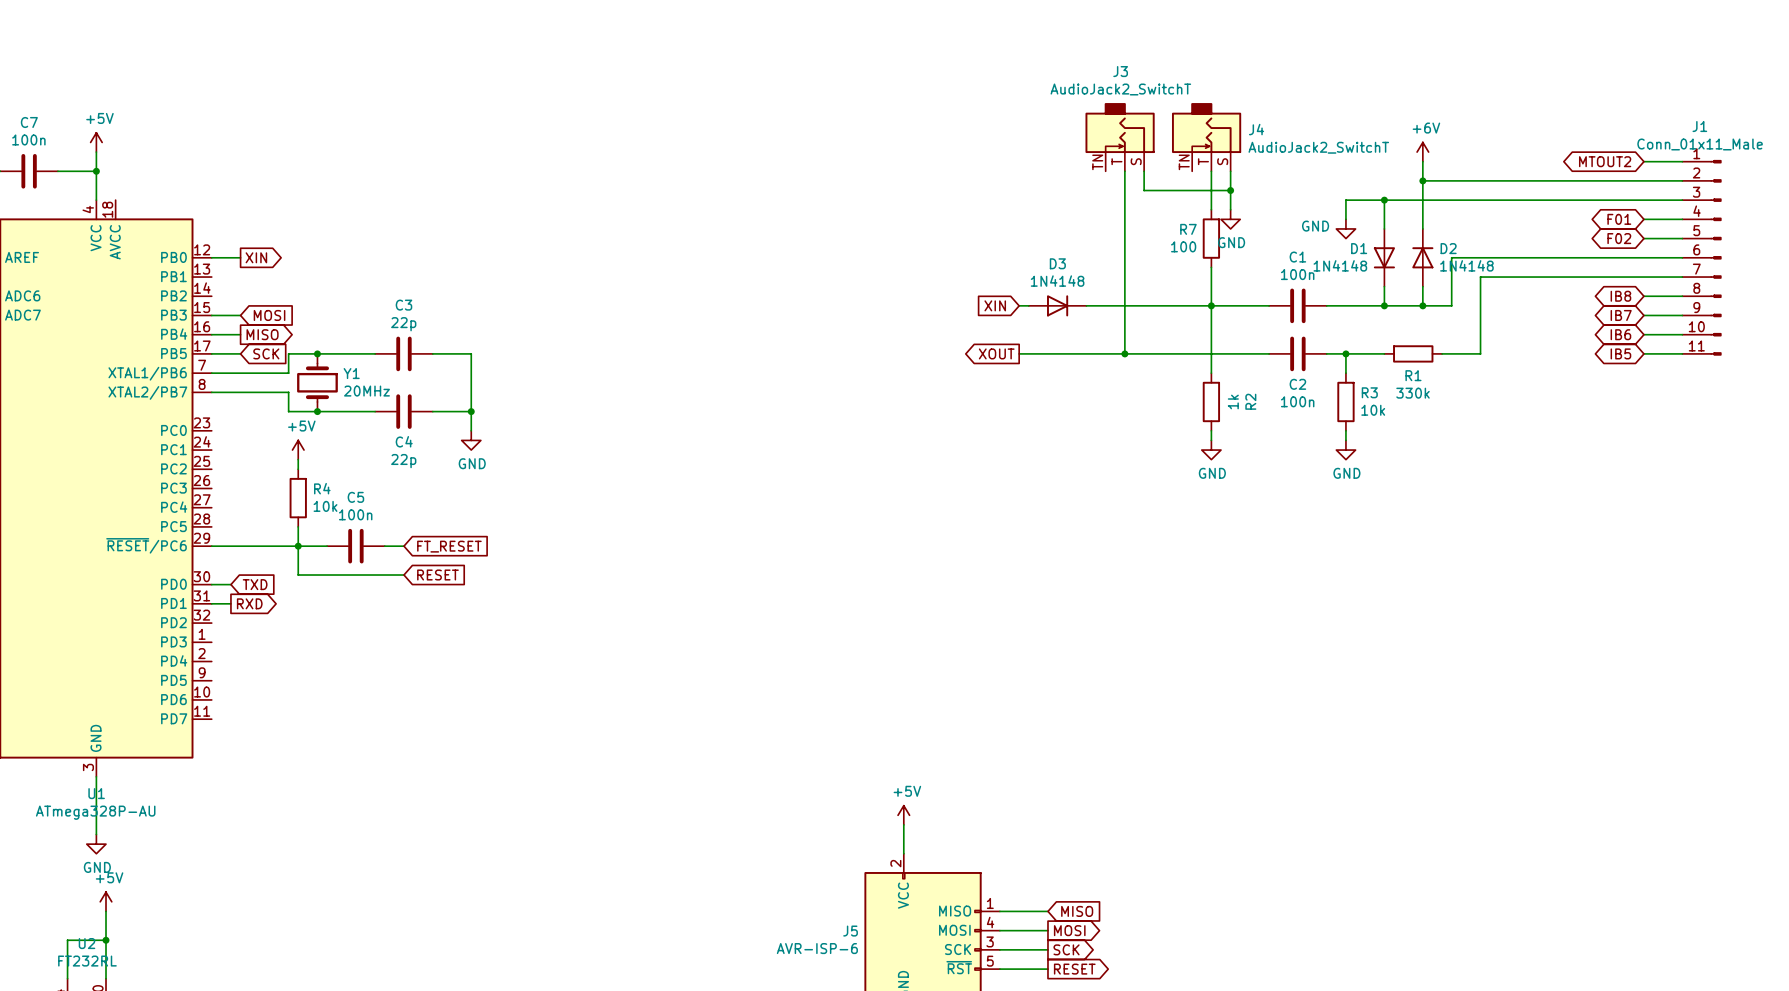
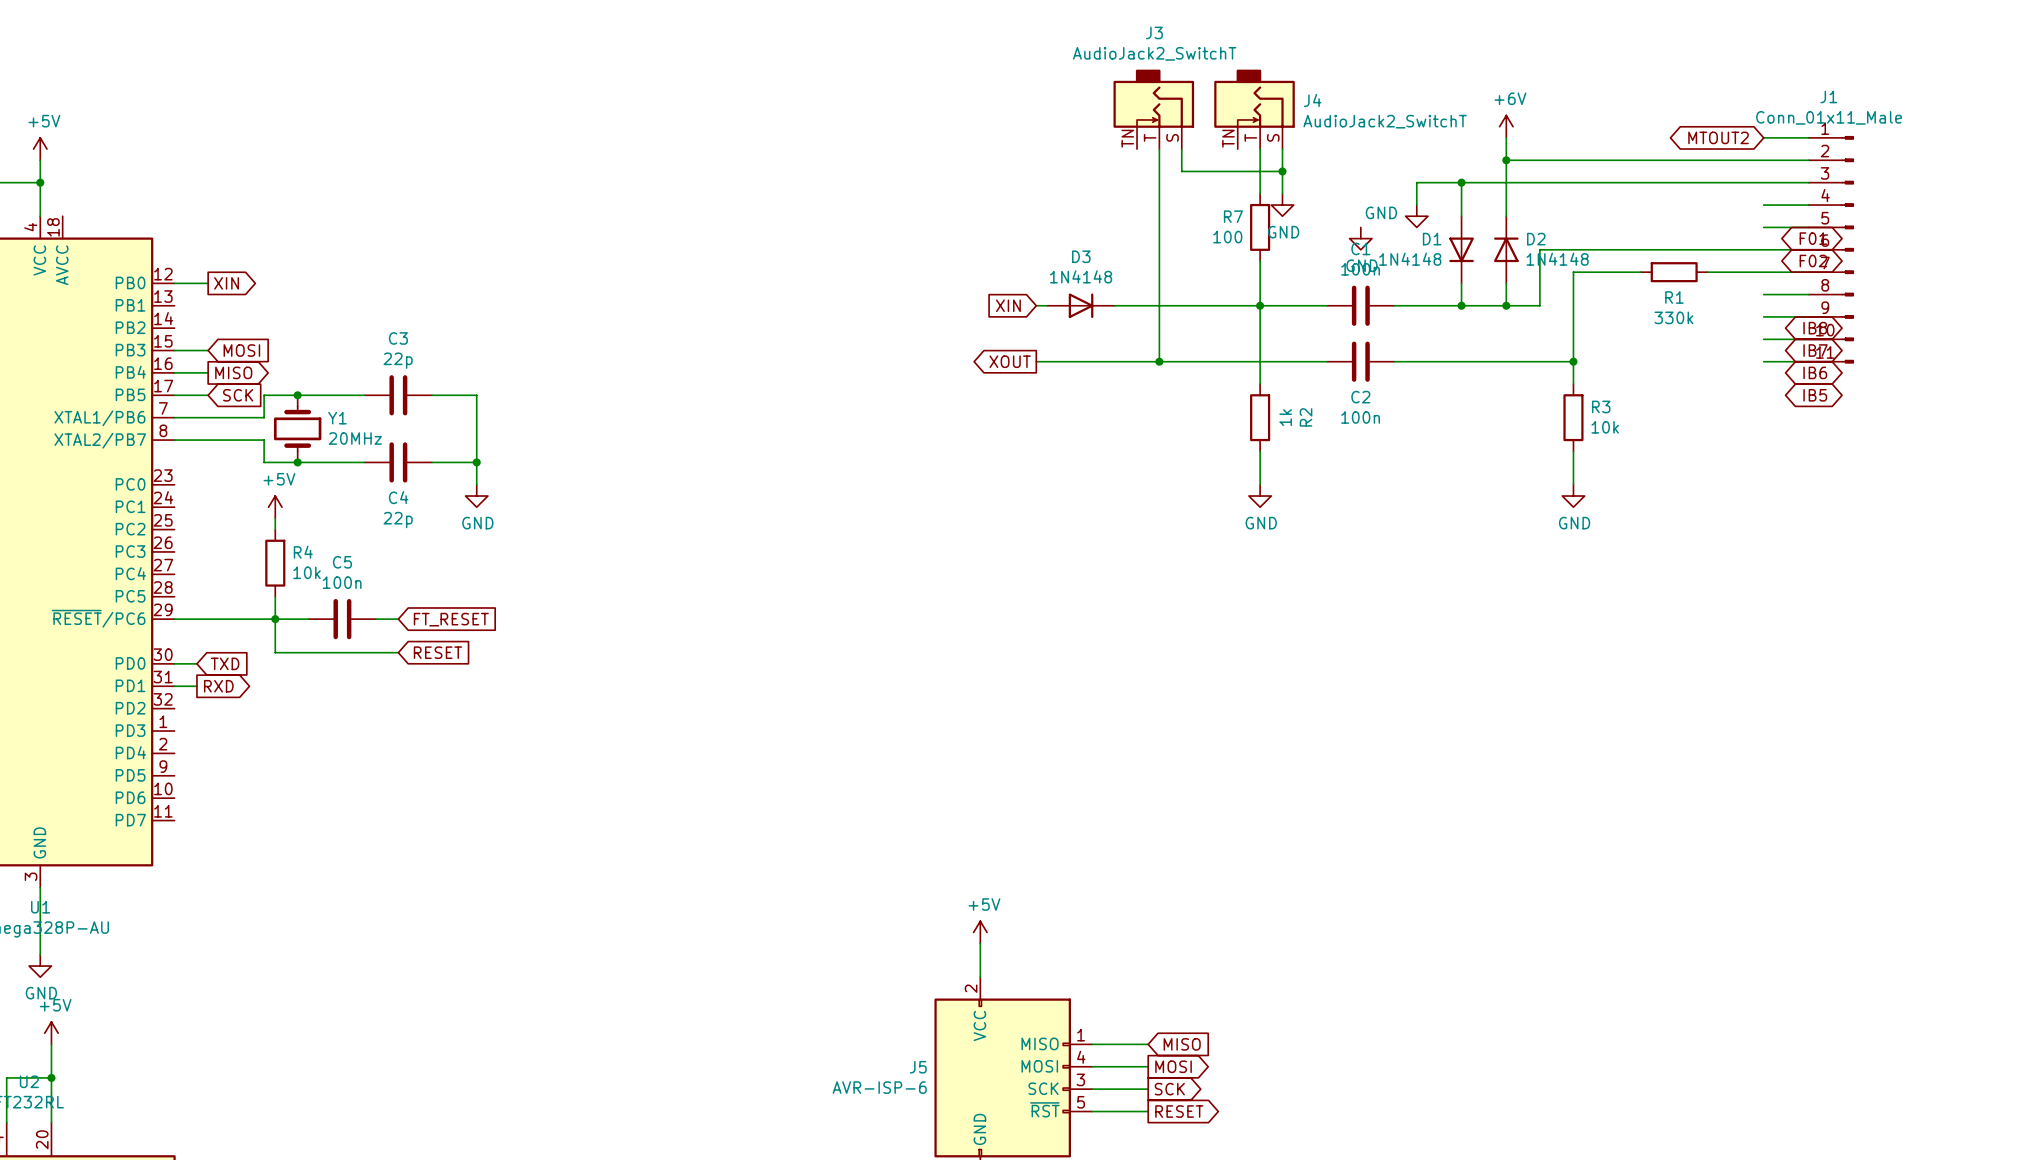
J3 position: (1120, 137) -> (1153, 109)
J4 position: (1206, 137) -> (1254, 109)
wire: none -> (1181, 149) (1181, 171) (1282, 171)
junction: none -> (1506, 160)
power symbol position: +6V (1422, 152) -> +6V (1506, 126)
junction: none -> (1282, 171)
wire: (1422, 161) (1422, 228) -> (1506, 137) (1506, 216)
global label position: MTOUT2 (1605, 161) -> MTOUT2 (1718, 137)
wire: (1643, 161) (1682, 161) -> (1763, 137) (1808, 137)
wire: (1124, 171) (1124, 353) -> (1159, 149) (1159, 361)
wire: (1211, 171) (1211, 209) -> none
wire: (1230, 171) (1230, 209) -> (1282, 149) (1282, 193)
junction: none -> (1461, 182)
wire: (1144, 180) (1144, 190) (1230, 190) -> none
wire: (1422, 180) (1682, 180) -> (1506, 160) (1808, 160)
junction: (1422, 180) -> none
power symbol: none -> GND (1282, 205)
junction: (1230, 190) -> none
wire: (1384, 200) (1384, 228) -> (1461, 182) (1461, 216)
junction: (1384, 200) -> none
wire: (1682, 200) (1345, 200) (1345, 219) -> (1808, 182) (1416, 182) (1416, 205)
wire: (1643, 219) (1682, 219) -> (1763, 205) (1808, 205)
power symbol position: GND (1345, 228) -> GND (1416, 216)
R7 position: (1211, 238) -> (1260, 227)
wire: (1643, 238) (1682, 238) -> (1763, 227) (1808, 227)
wire: none -> (1640, 272) (1573, 272) (1573, 384)
wire: none -> (1707, 272) (1808, 272)
D1 position: (1384, 257) -> (1461, 249)
D2 position: (1422, 257) -> (1506, 249)
wire: (1682, 257) (1451, 257) (1451, 305) (1326, 305) -> (1808, 249) (1539, 249) (1539, 305) (1394, 305)
J1 position: (1701, 257) -> (1831, 249)
wire: (1211, 267) (1211, 373) -> (1260, 260) (1260, 384)
junction: none -> (1260, 305)
junction: none -> (1461, 305)
junction: none -> (1506, 305)
wire: (1682, 277) (1480, 277) (1480, 353) (1442, 353) -> none
wire: (1384, 286) (1384, 305) -> (1461, 283) (1461, 305)
wire: (1422, 286) (1422, 305) -> (1506, 283) (1506, 305)
wire: (1643, 296) (1682, 296) -> (1763, 294) (1808, 294)
global label position: XIN (995, 305) -> XIN (1008, 305)
wire: (1019, 305) (1028, 305) -> (1036, 305) (1047, 305)
D3 position: (1057, 305) -> (1081, 305)
wire: (1086, 305) (1269, 305) -> (1114, 305) (1327, 305)
junction: (1211, 305) -> none
C1 position: (1297, 305) -> (1360, 305)
junction: (1384, 305) -> none
junction: (1422, 305) -> none
wire: (1643, 315) (1682, 315) -> (1763, 316) (1808, 316)
junction: none -> (1159, 361)
wire: none -> (1394, 361) (1573, 361)
junction: none -> (1573, 361)
wire: (1643, 334) (1682, 334) -> (1763, 339) (1808, 339)
global label position: XOUT (996, 353) -> XOUT (1010, 361)
wire: (1019, 353) (1269, 353) -> (1036, 361) (1327, 361)
junction: (1124, 353) -> none
C2 position: (1297, 353) -> (1360, 361)
wire: (1326, 353) (1384, 353) -> none
wire: (1345, 353) (1345, 373) -> none
junction: (1345, 353) -> none
R1 position: (1413, 353) -> (1674, 272)
wire: (1643, 353) (1682, 353) -> (1763, 361) (1808, 361)
wire: none -> (1260, 451) (1260, 484)
R2 position: (1211, 401) -> (1260, 417)
R3 position: (1345, 401) -> (1573, 417)
wire: none -> (1573, 451) (1573, 484)
wire: (1211, 430) (1211, 440) -> none
wire: (1345, 430) (1345, 440) -> none
power symbol position: GND (1211, 450) -> GND (1260, 496)
power symbol position: GND (1345, 450) -> GND (1573, 496)

